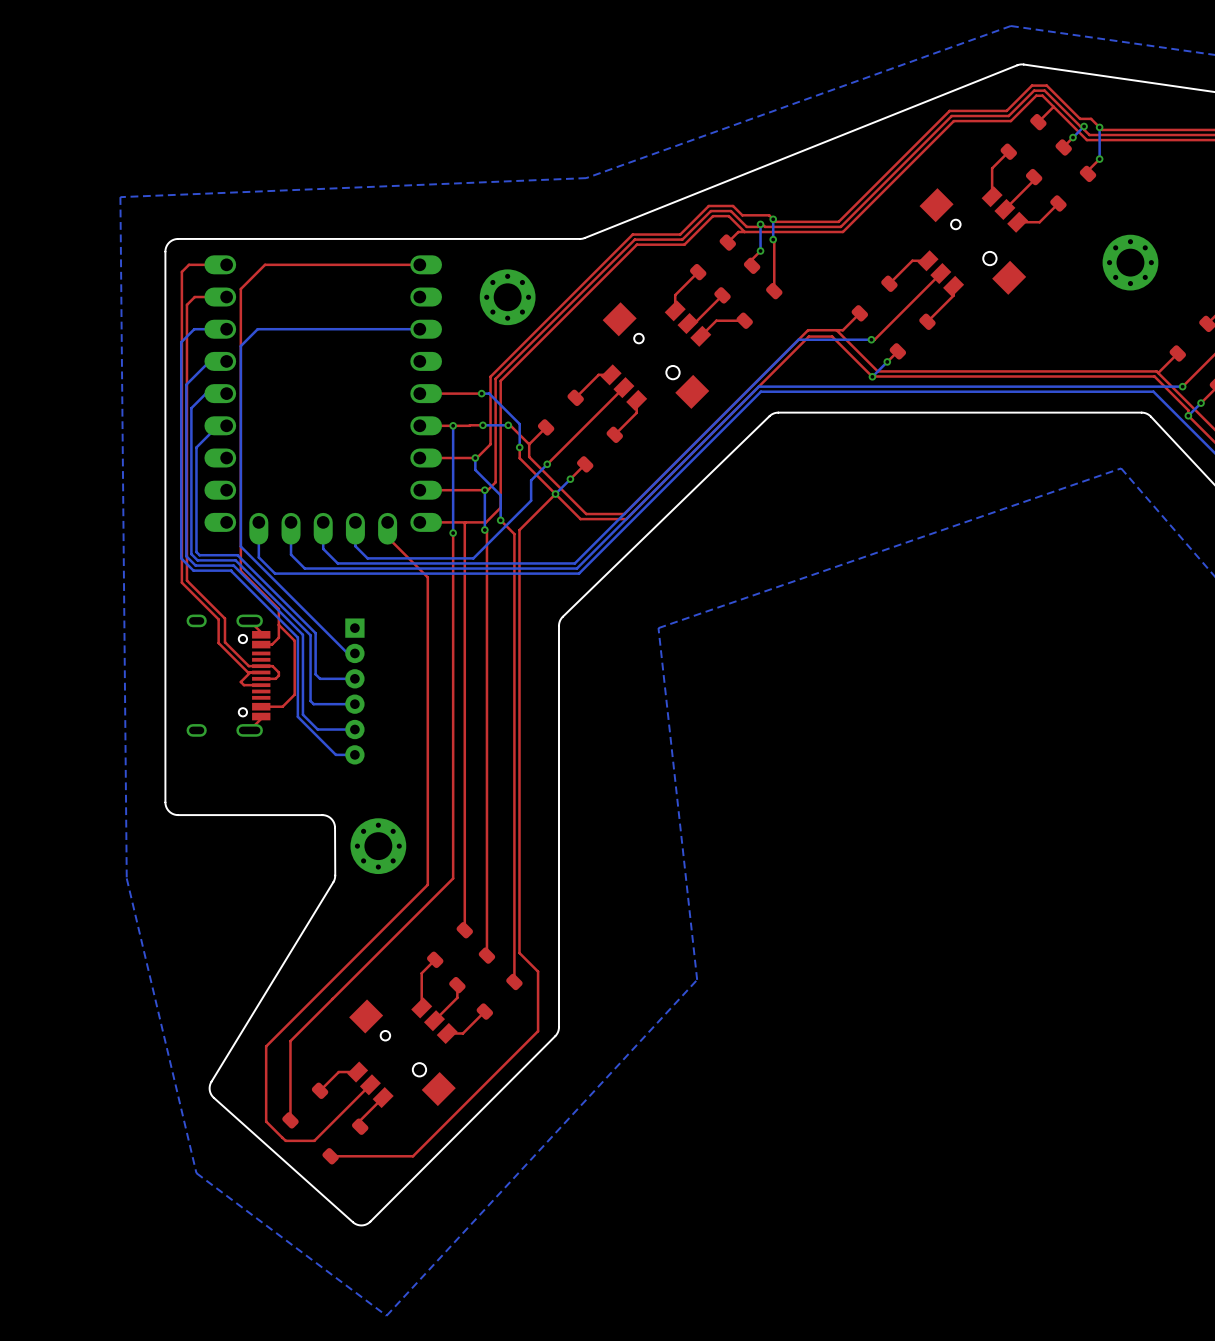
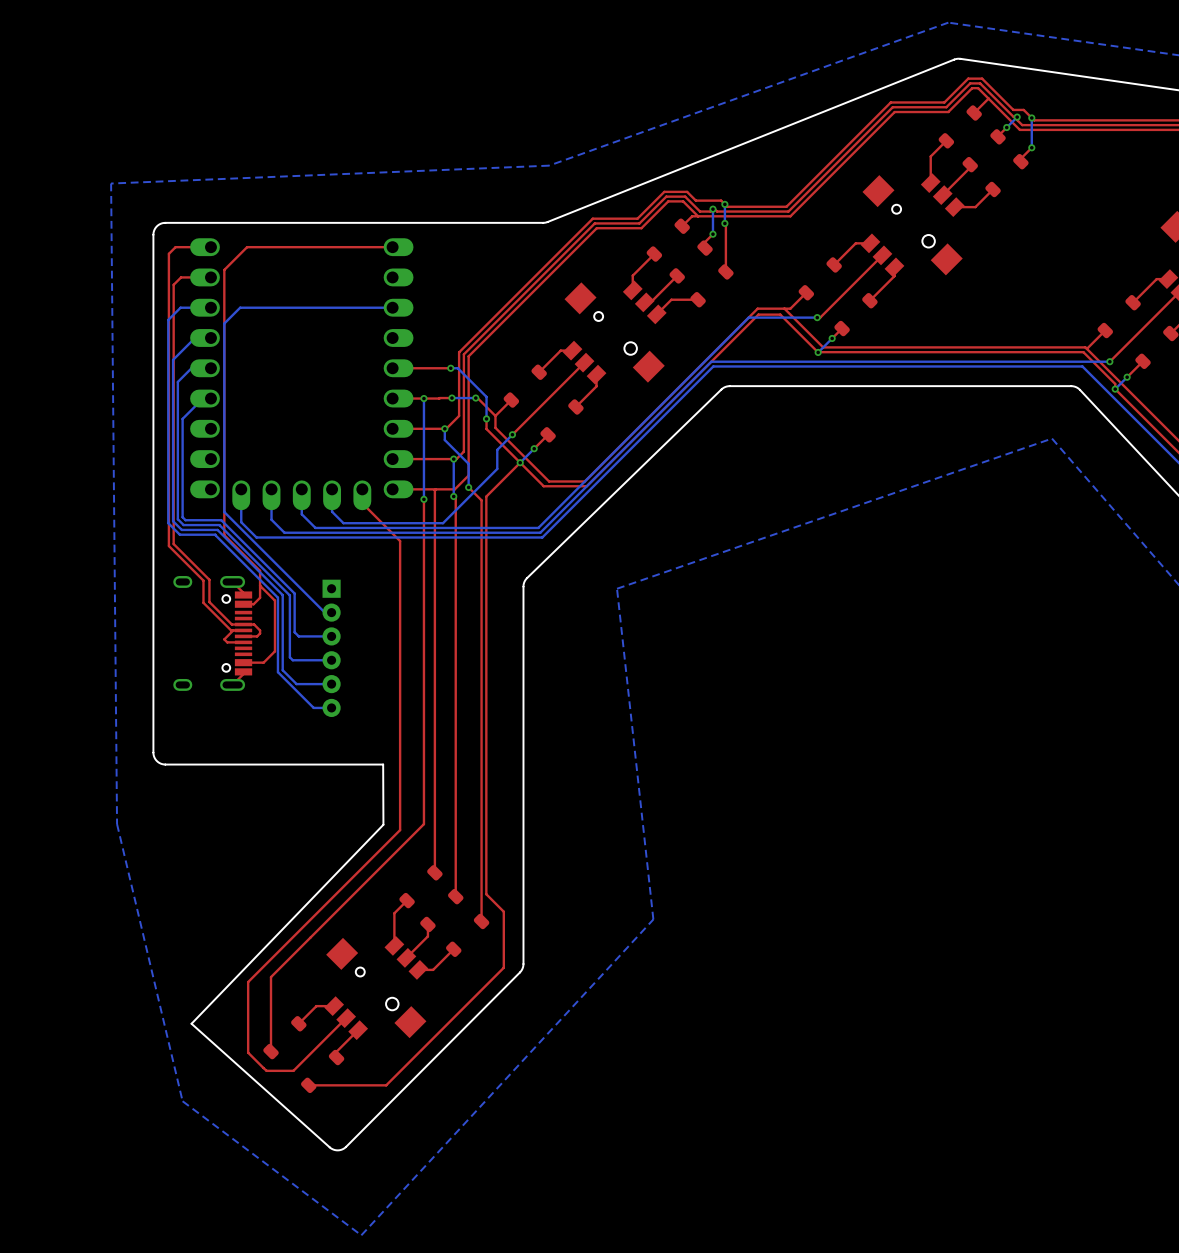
part: (1130, 262) -> none
part: (507, 297) -> none
board edge: (322, 815) (330, 817) (334, 826) (334, 880) (211, 1081) (209, 1090) (213, 1097) -> (300, 764) (383, 764) (383, 824) (191, 1023) (198, 1030)
part: (378, 846) -> none

